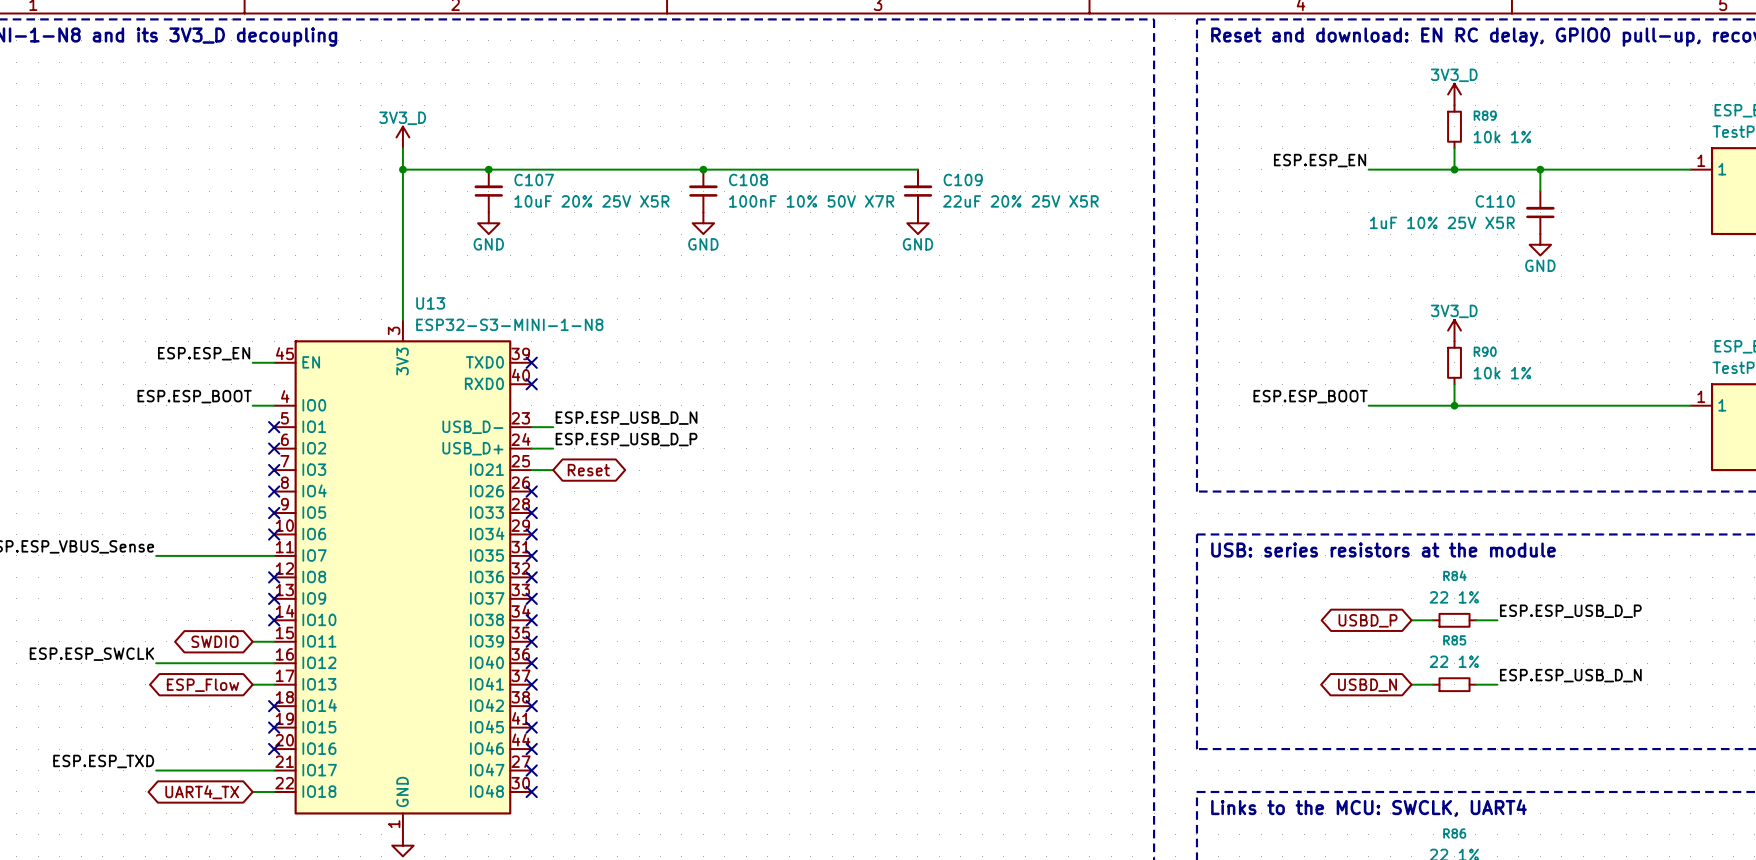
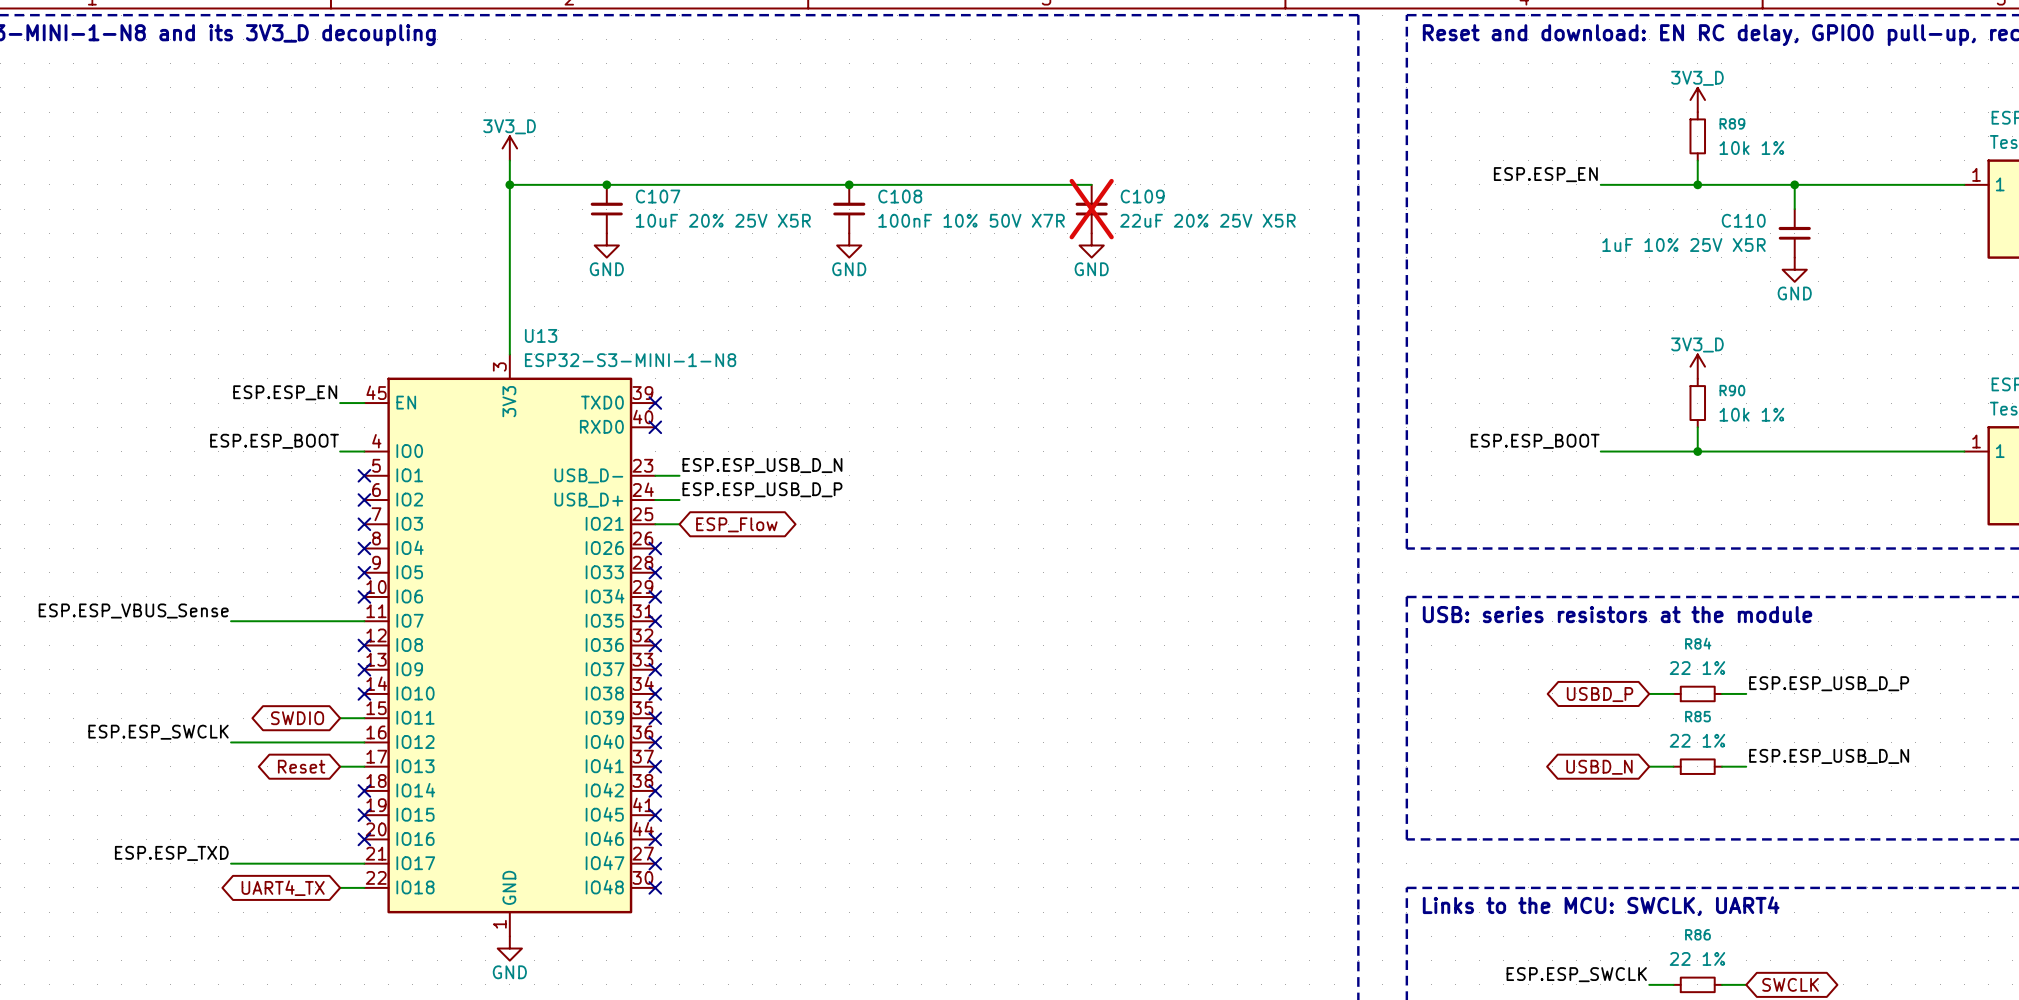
C109 do-not-place cross: none -> (1091, 209)
global label: Reset (588, 470) -> ESP_Flow (736, 524)
global label: ESP_Flow (203, 685) -> Reset (301, 766)

